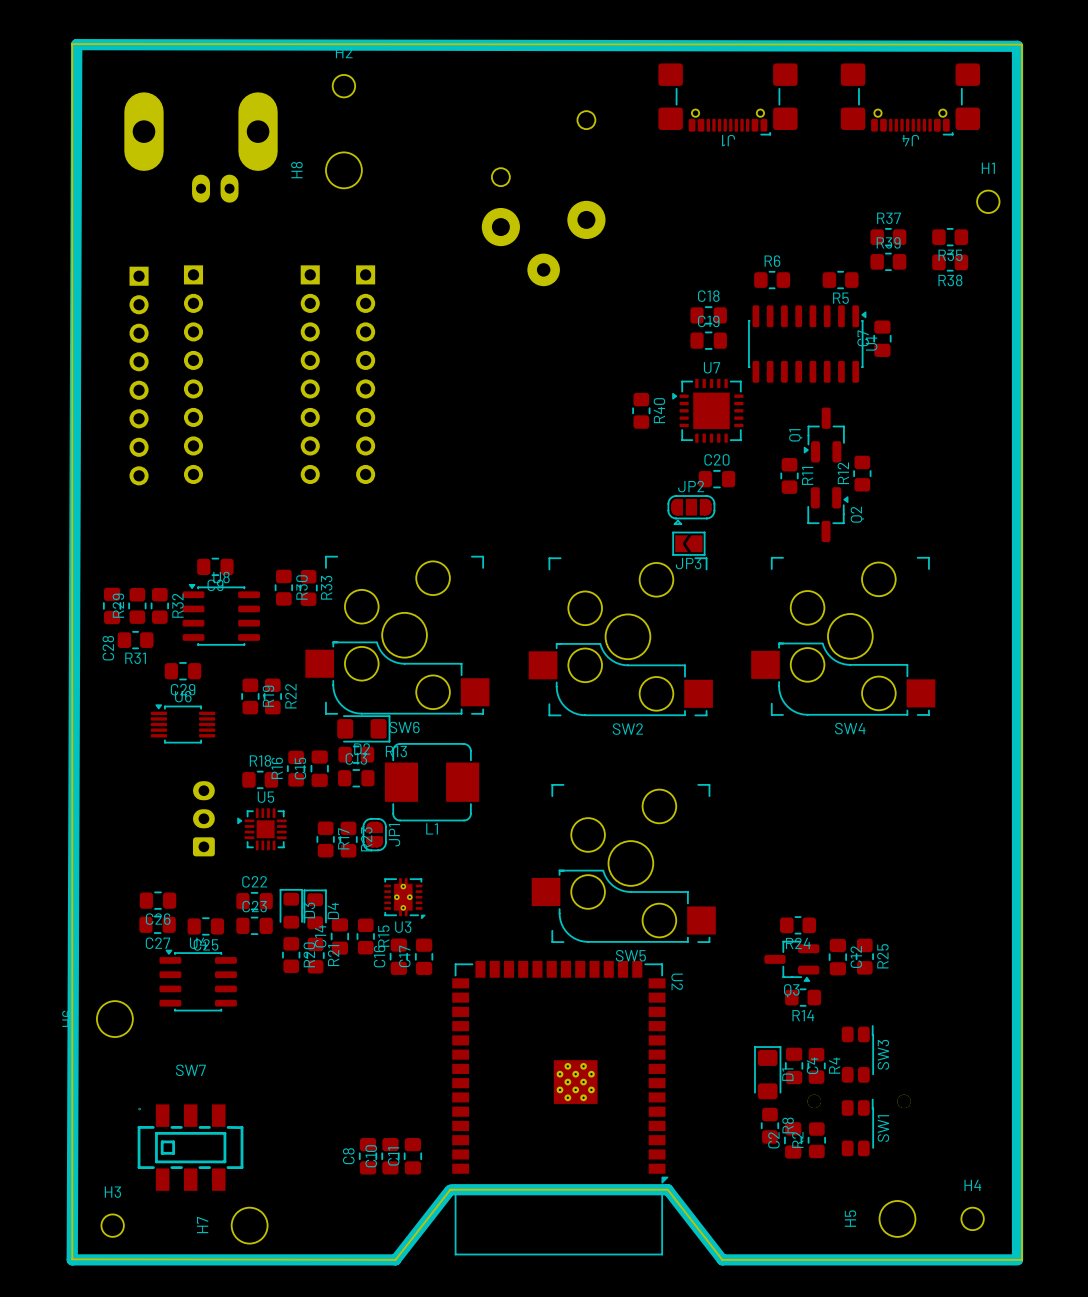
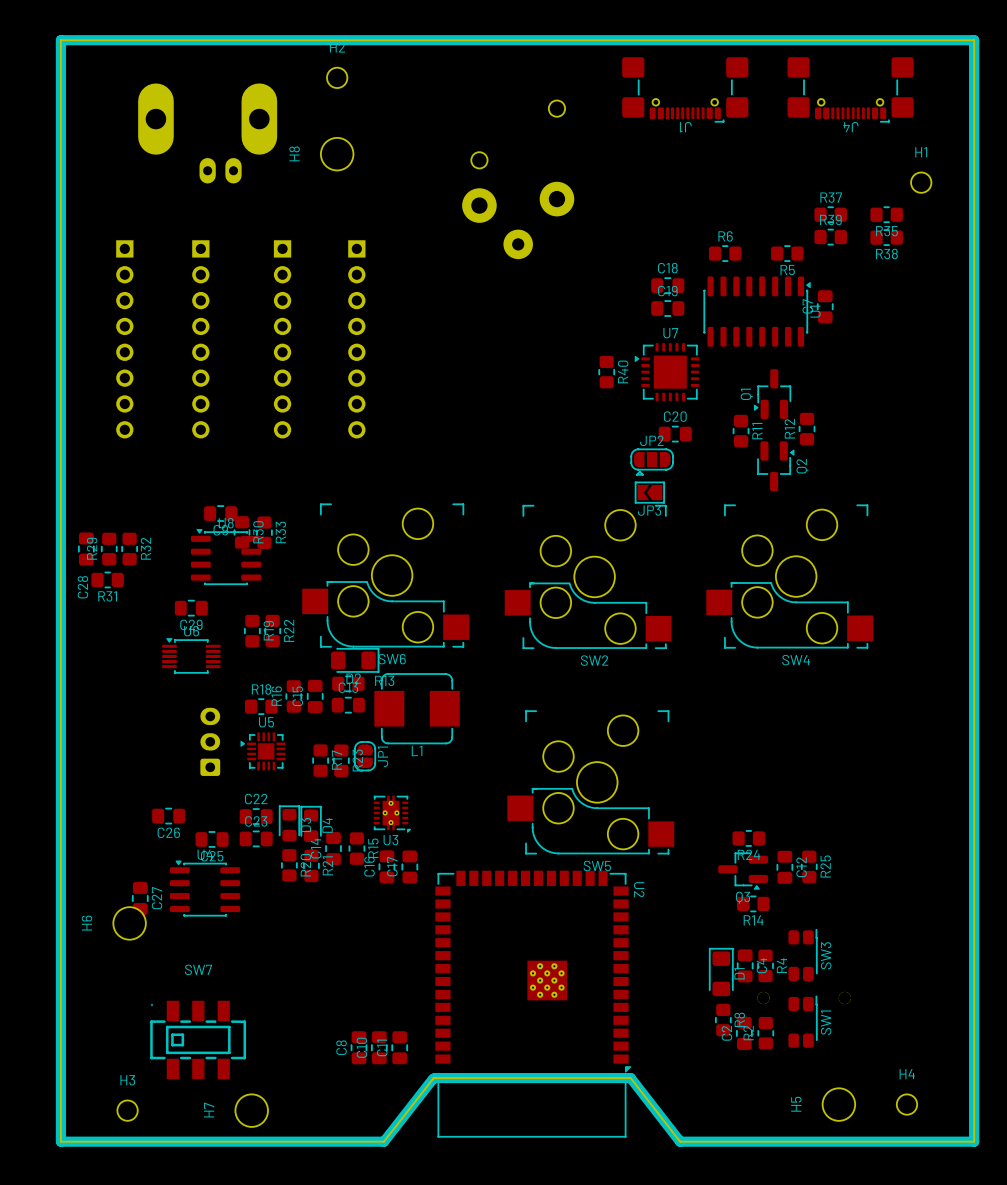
part position: (310, 374) -> (282, 339)
part position: (139, 376) -> (124, 339)
R30 position: (283, 587) -> (242, 532)
R33 position: (308, 587) -> (264, 532)
C28 position: (112, 605) -> (86, 548)
R29 position: (137, 605) -> (109, 548)
R32 position: (159, 605) -> (129, 548)
R31 position: (135, 640) -> (107, 579)
C27 rotation: 0° (157, 924) -> 90° clockwise (140, 898)
C27 position: (157, 924) -> (140, 898)
C27 name position: C27 (157, 943) -> C27 (157, 898)
board edge: (395, 1259) (72, 1259) (72, 44) (1022, 44) (1022, 1259) -> (383, 1141) (60, 1141) (60, 40) (974, 40) (974, 1141) (951, 1141)
line: (1017, 1259) (1017, 46) (76, 44) (72, 1259) -> (947, 1141) (974, 1141) (974, 40) (60, 40) (60, 1141) (90, 1141)

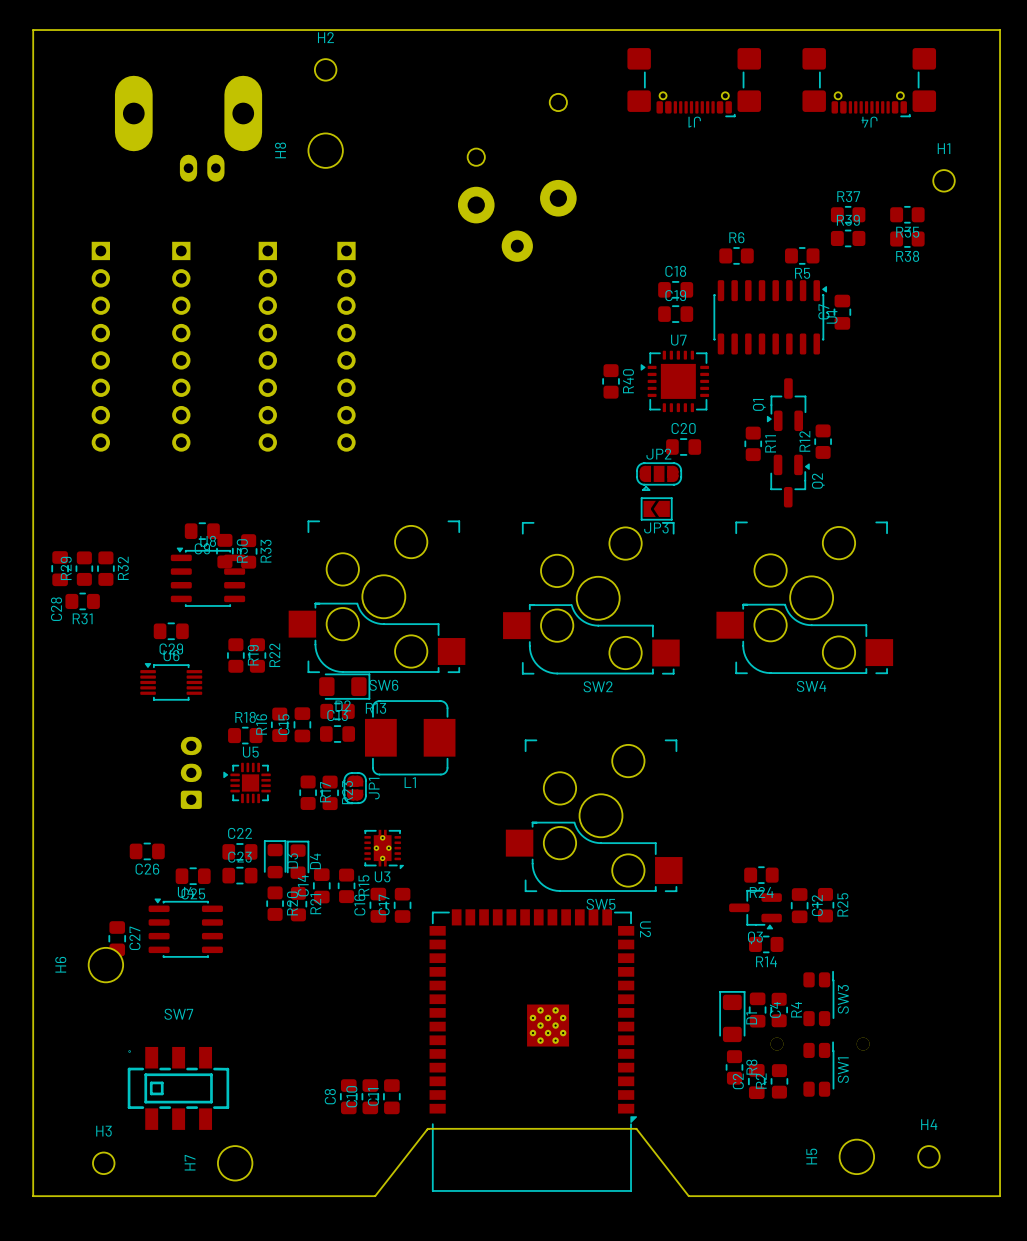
line: (434, 1078) (630, 1078) (680, 1141) (974, 1141) (974, 40) (60, 40) (60, 1141) (383, 1141) (433, 1078) -> none

